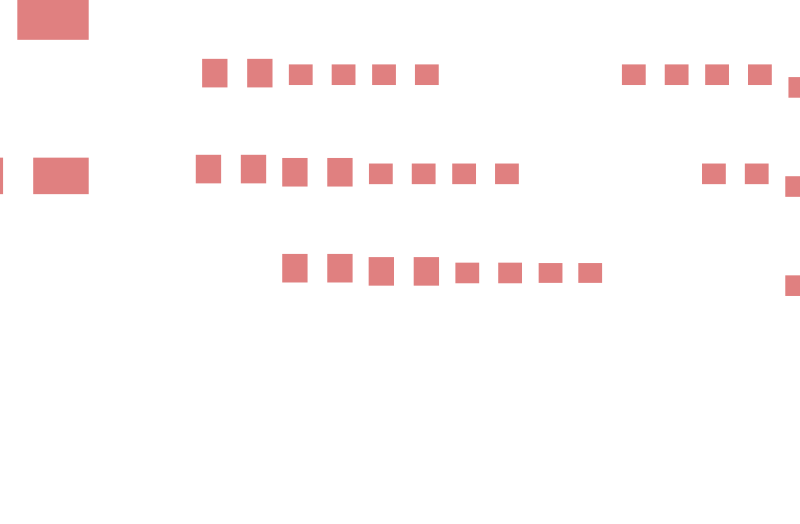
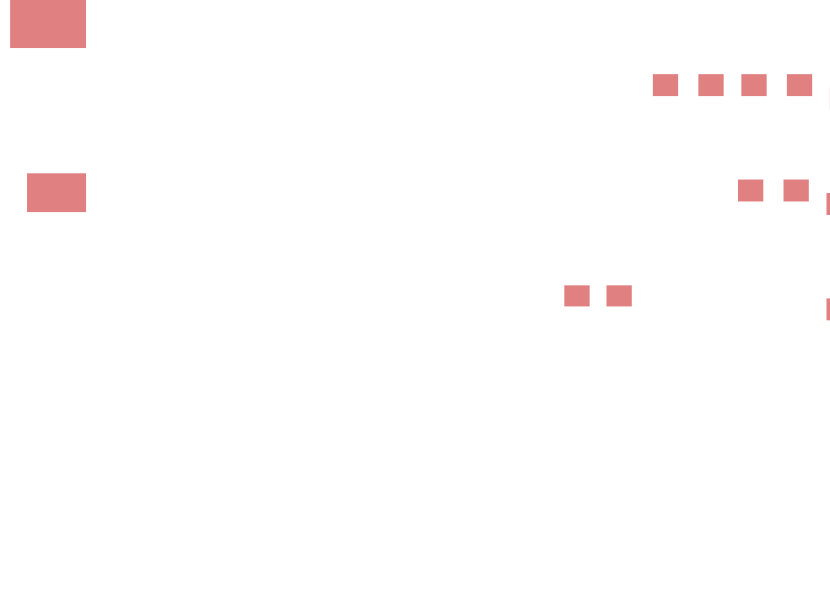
part: (237, 73) -> none
part: (322, 74) -> none
part: (405, 74) -> none
part: (230, 169) -> none
part: (317, 172) -> none
part: (402, 173) -> none
part: (485, 173) -> none
part: (317, 268) -> none
part: (403, 271) -> none
part: (488, 272) -> none

